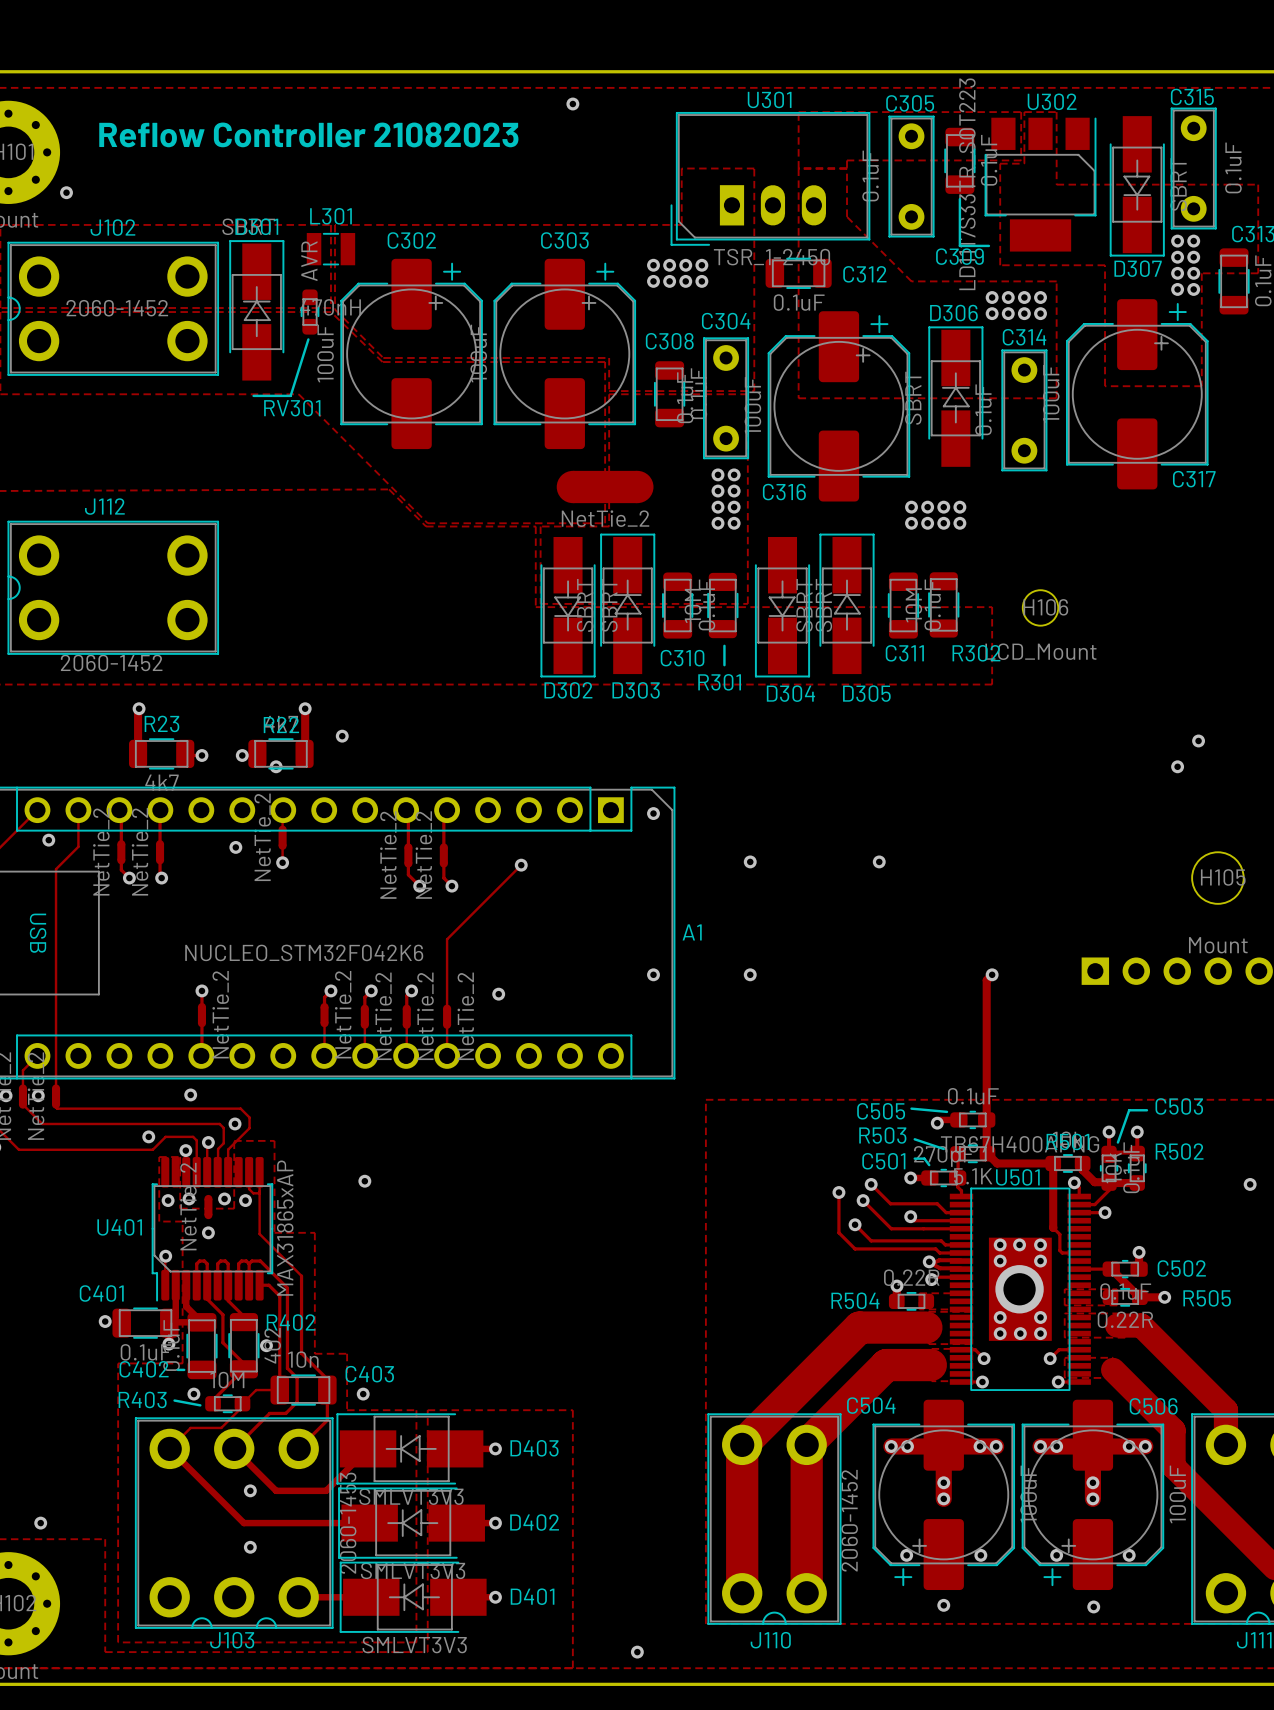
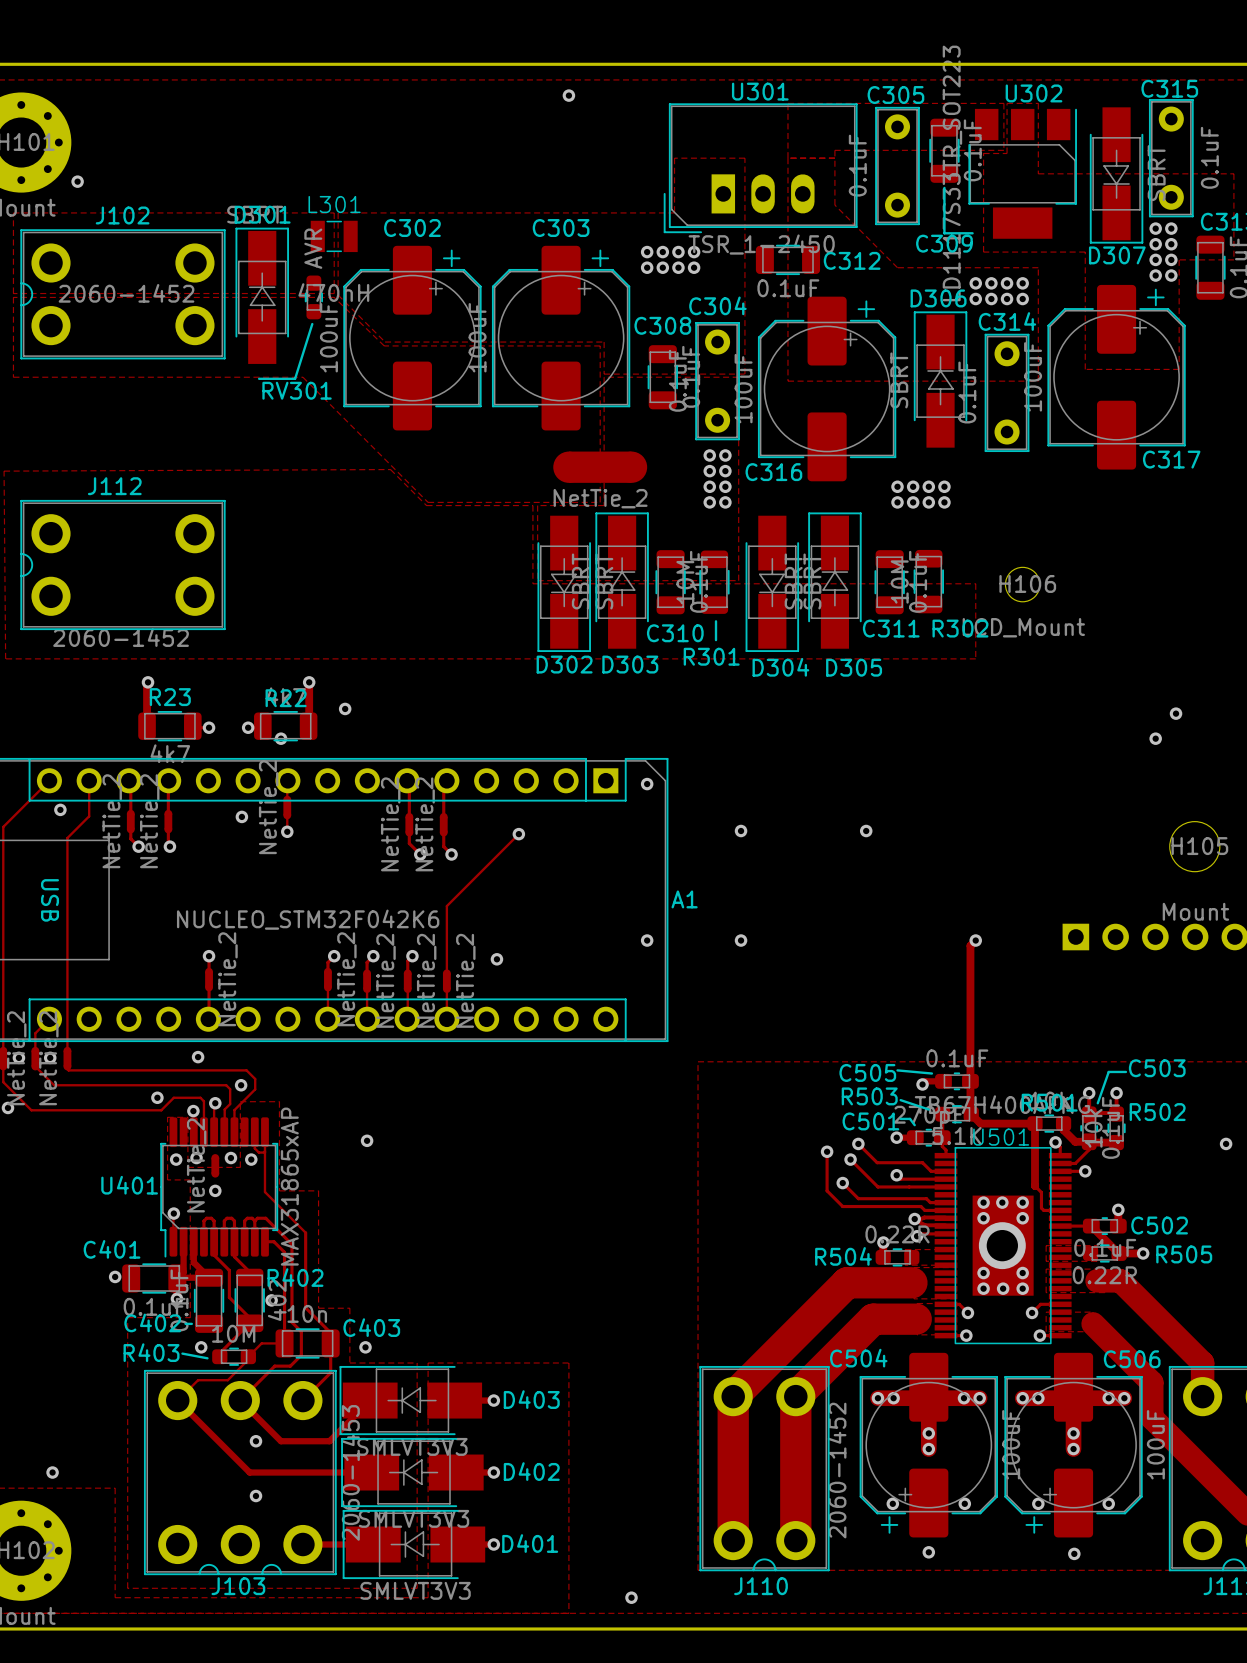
text: Reflow Controller 21082023 (308, 134) -> none

